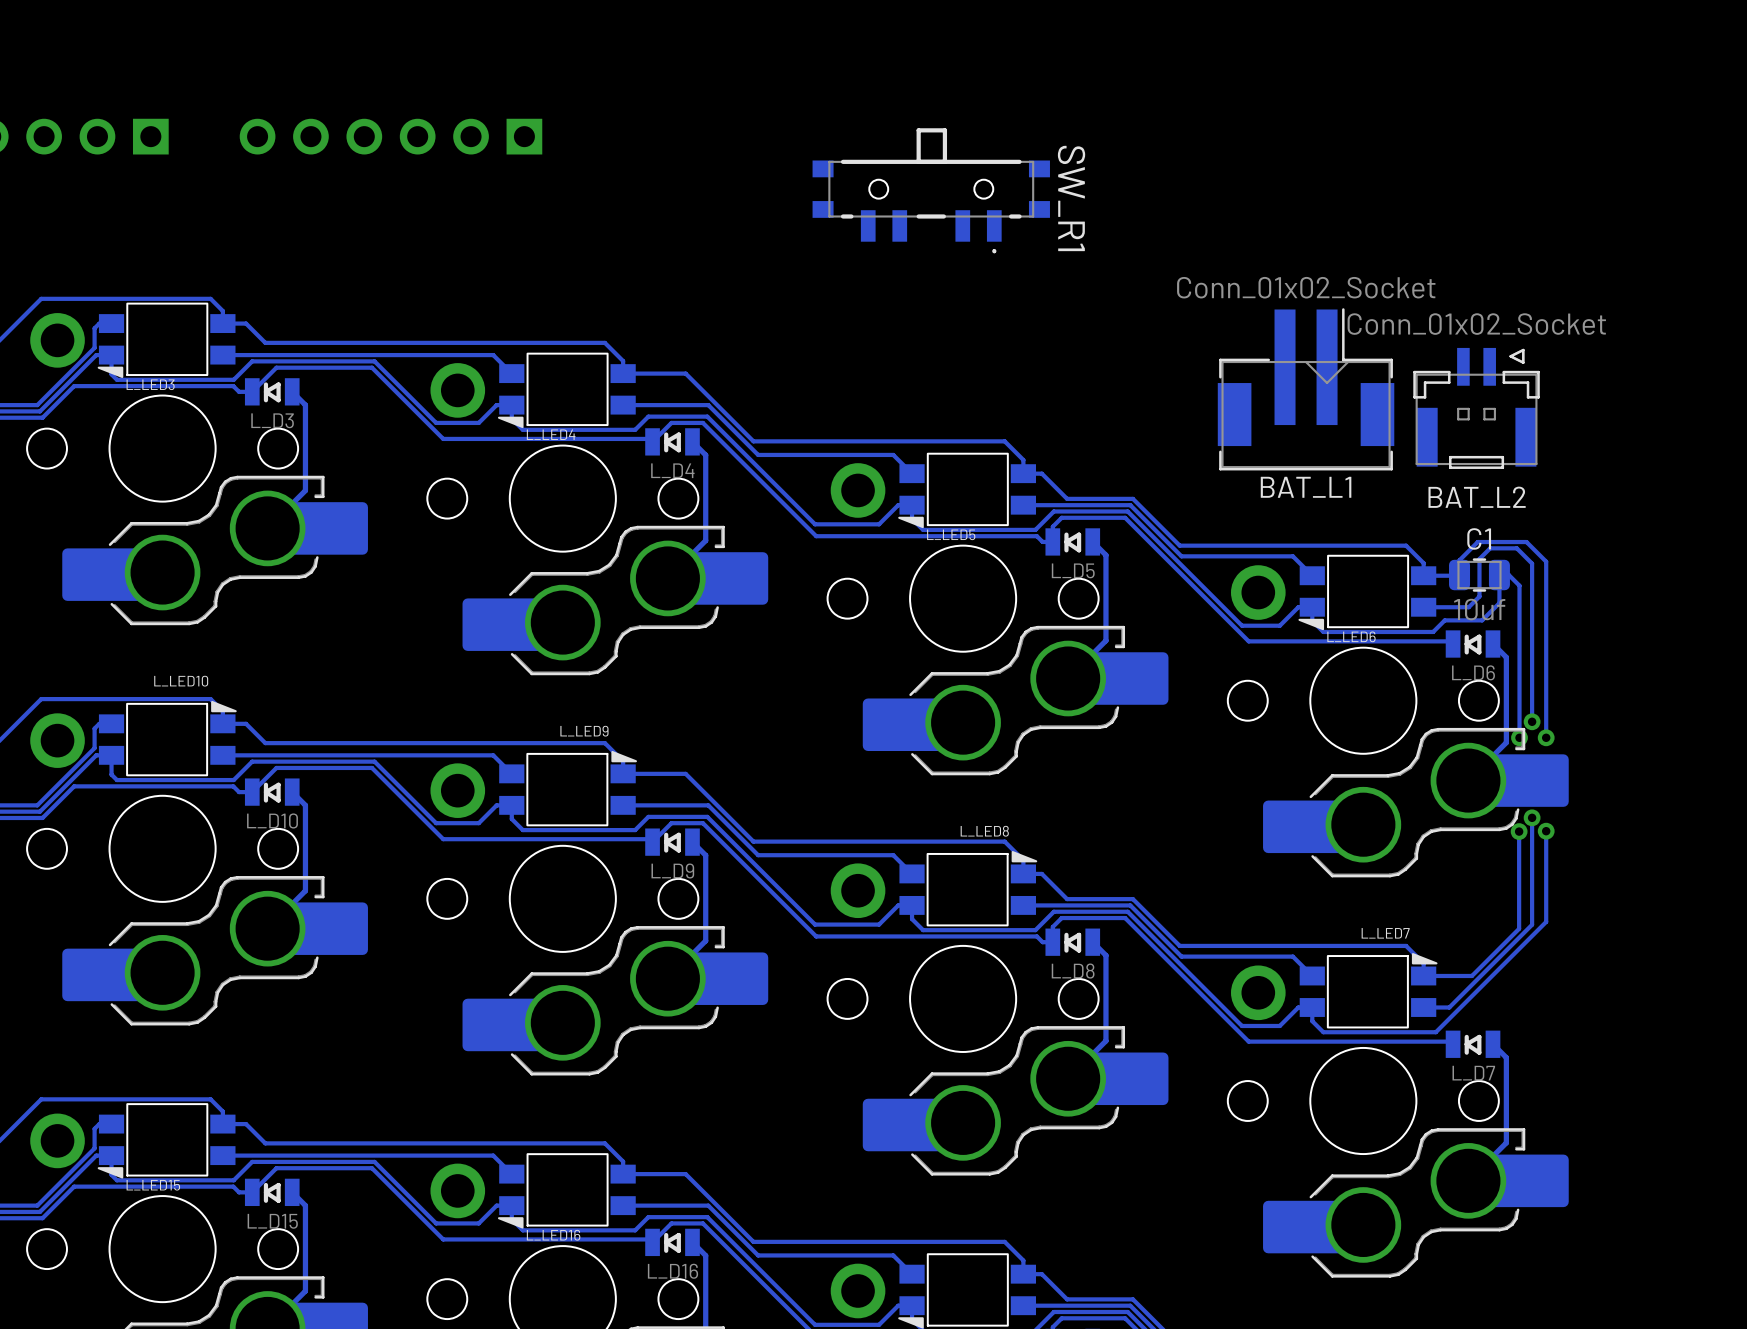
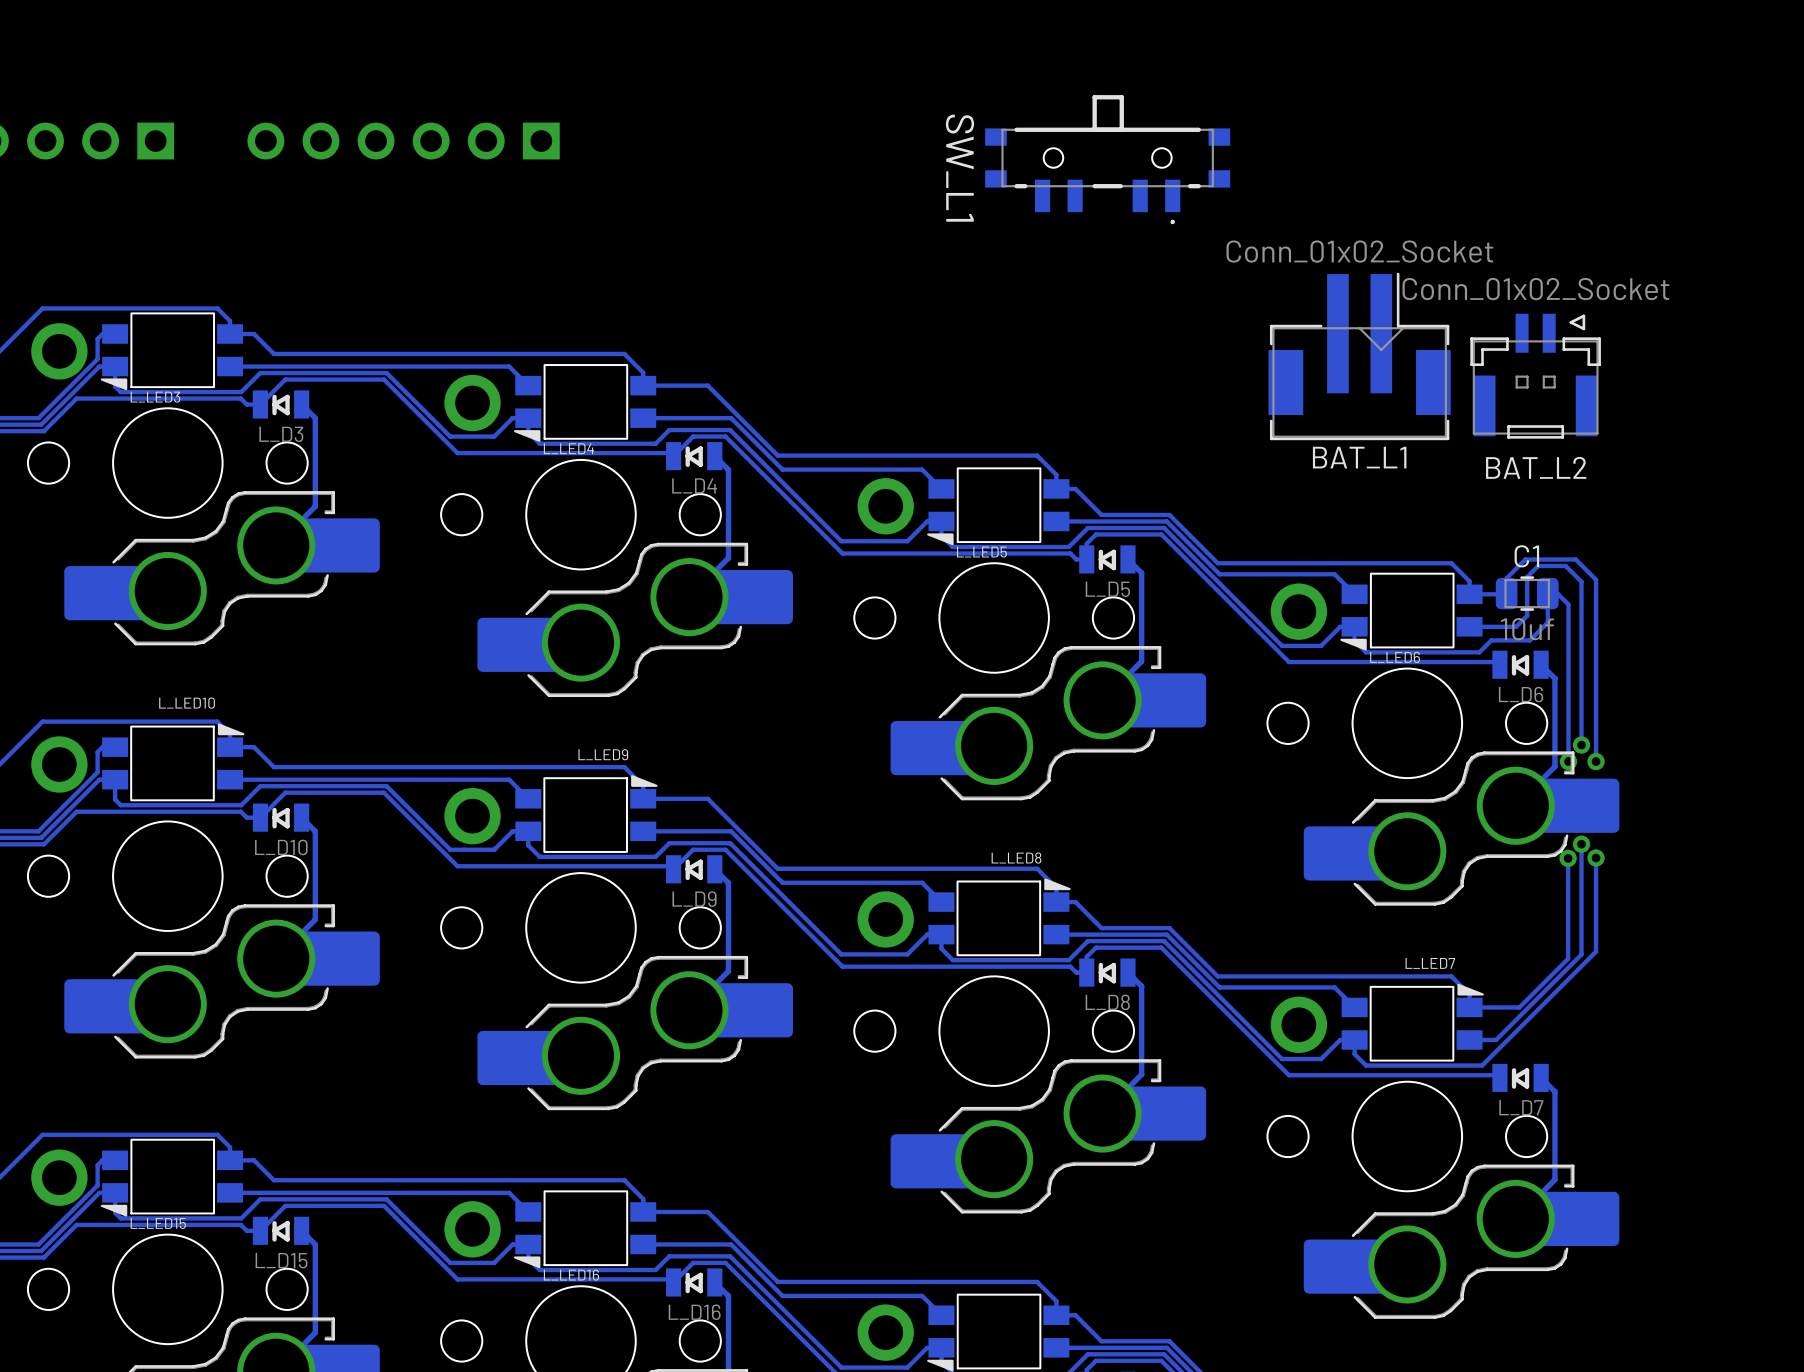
SW_L1: none -> (1107, 159)
SW_R1: (931, 190) -> none
BAT_L1 position: (1306, 389) -> (1359, 356)
BAT_L2 position: (1476, 408) -> (1535, 376)

